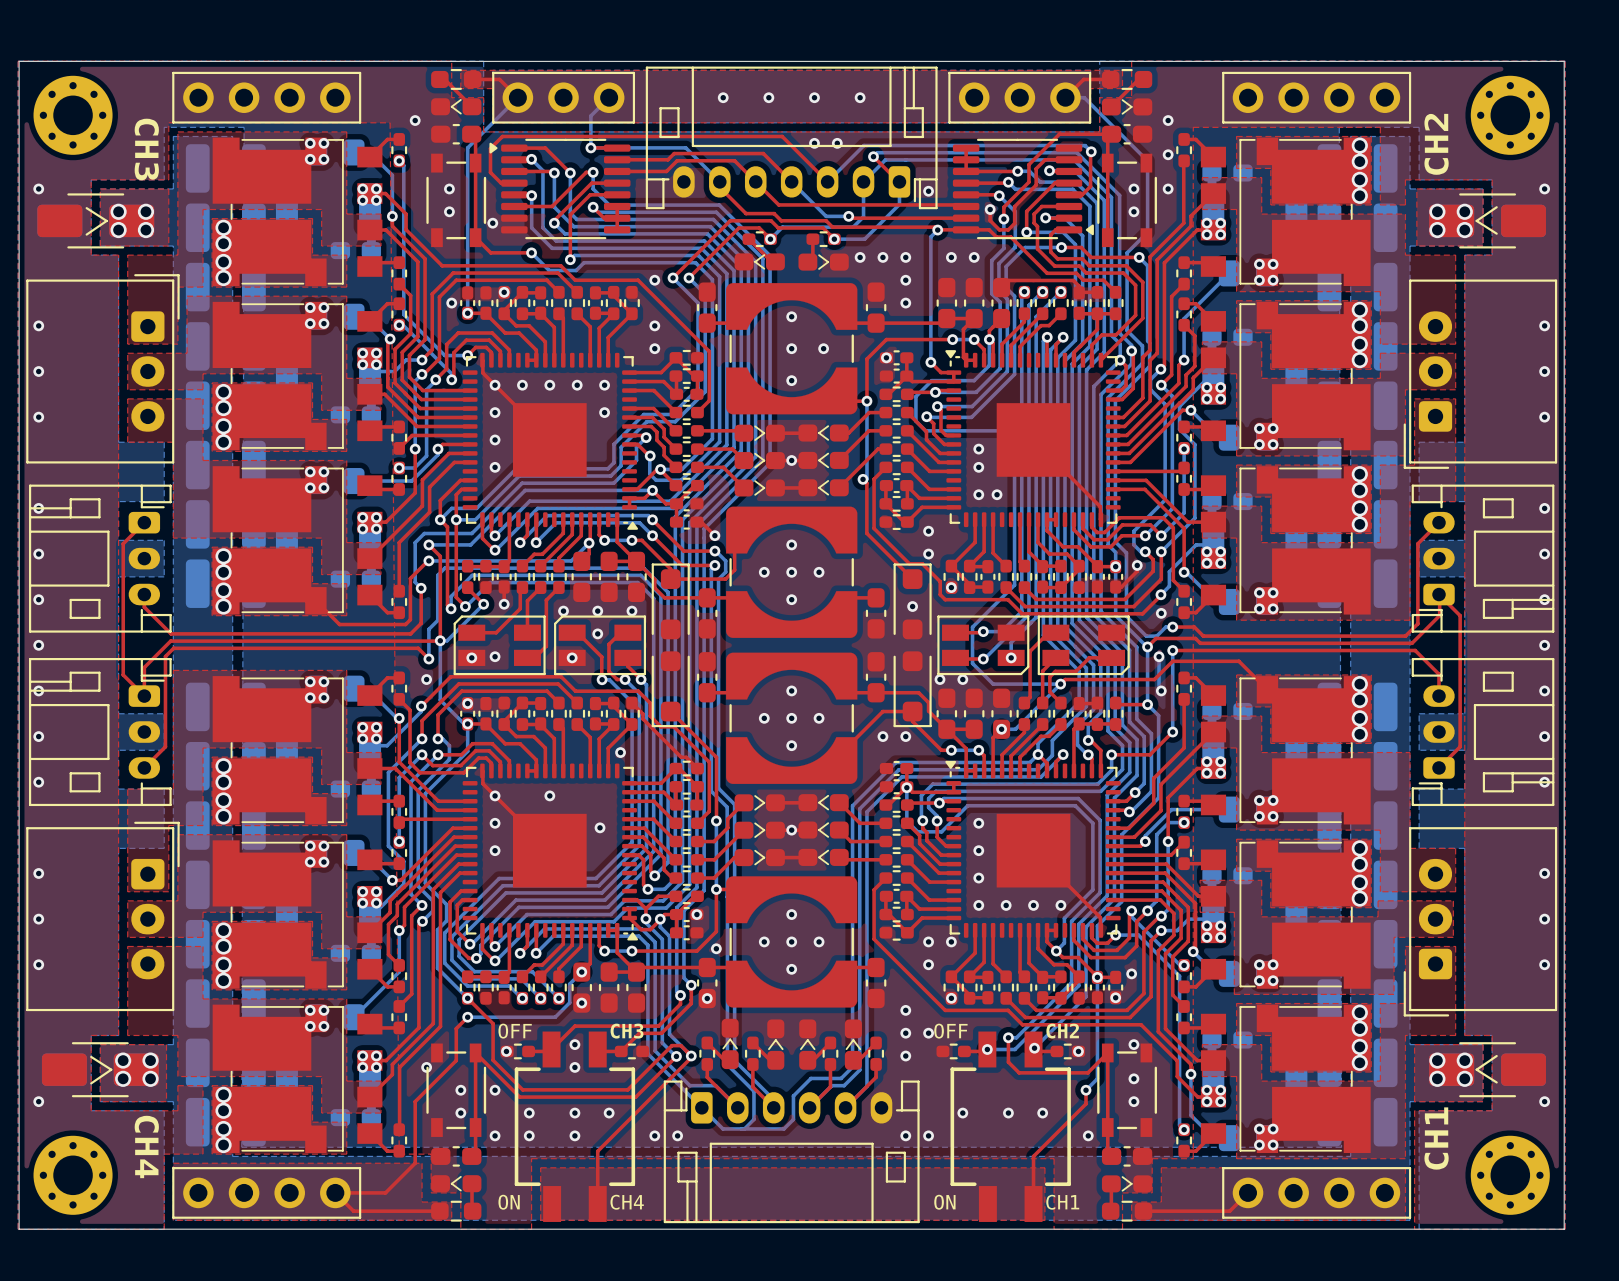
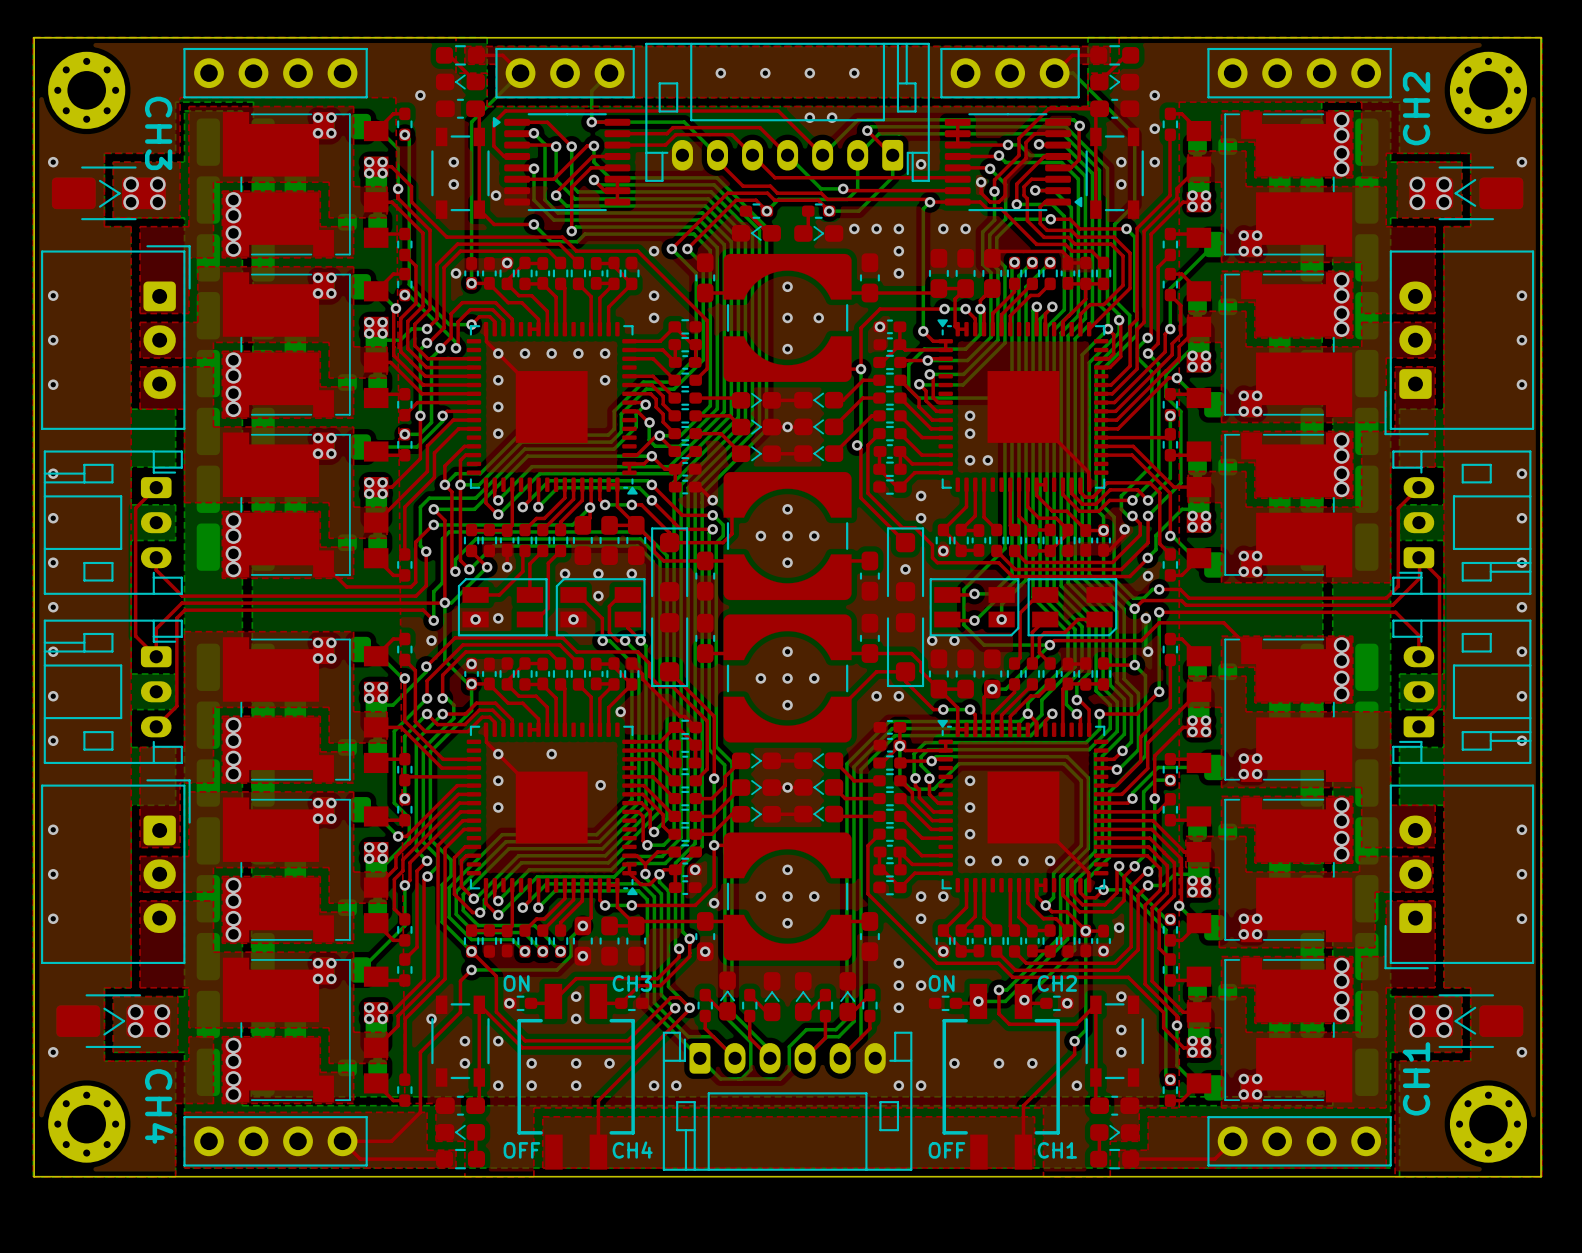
text: OFF (515, 1031) -> ON (516, 983)
text: OFF (950, 1031) -> ON (941, 983)
text: ON (509, 1202) -> OFF (521, 1150)
text: ON (944, 1202) -> OFF (946, 1150)

